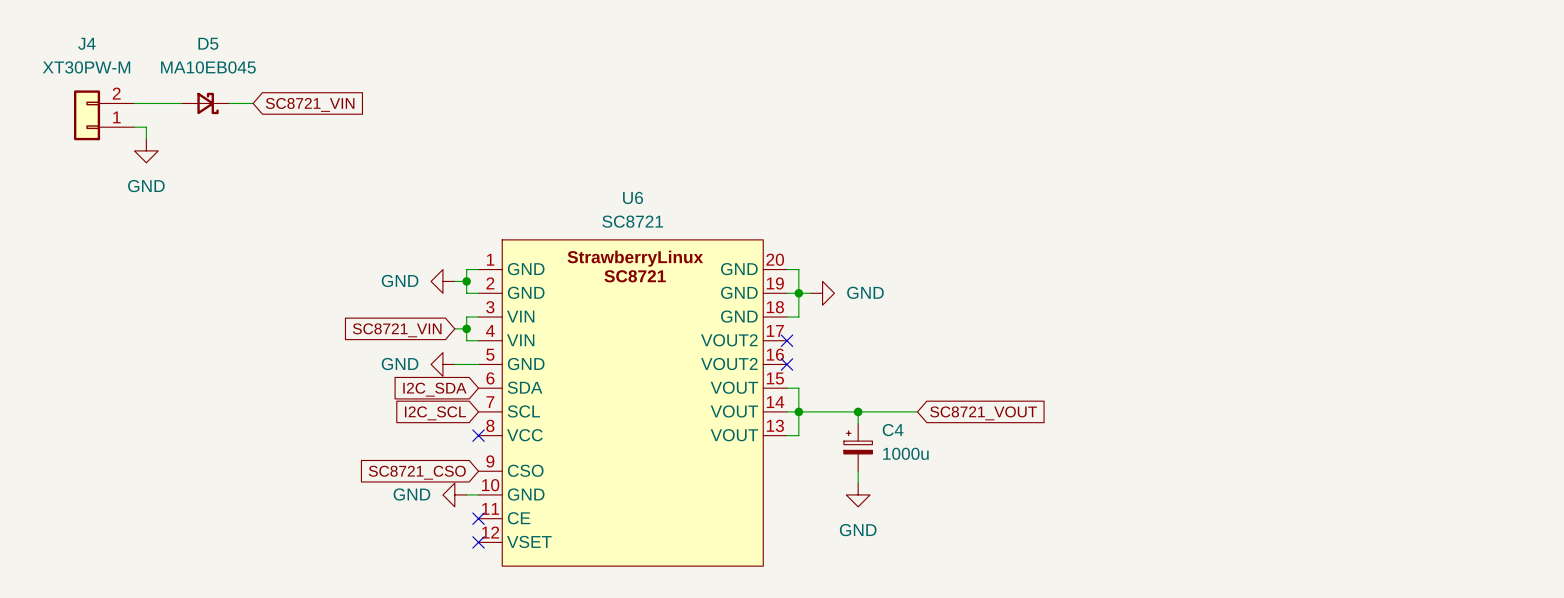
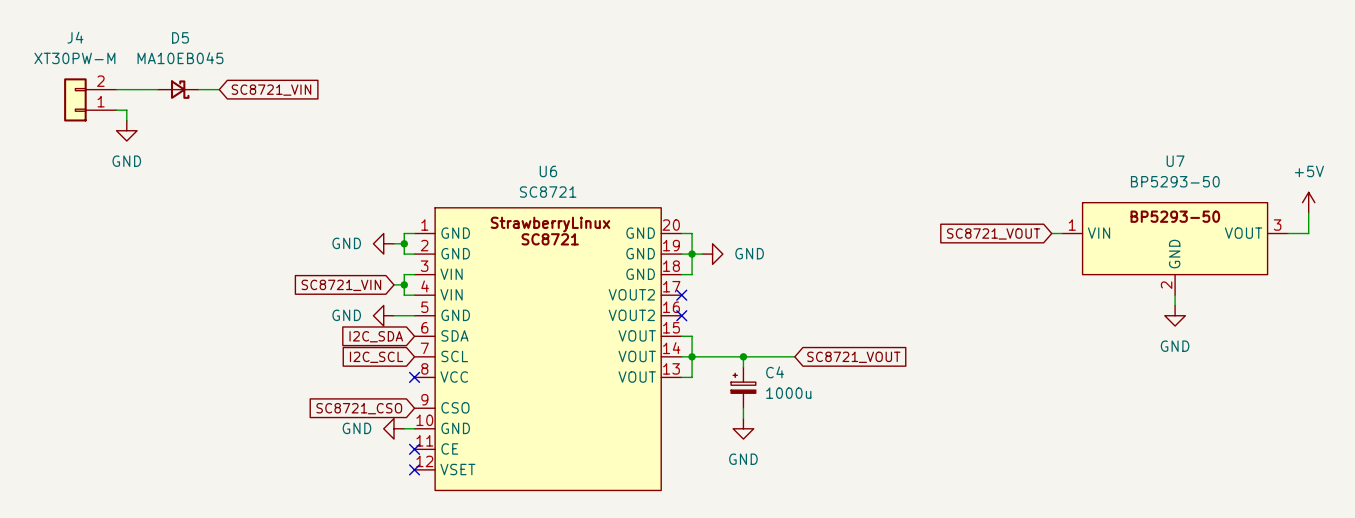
power symbol: none -> +5V (1308, 202)
wire: none -> (1308, 212) (1308, 233) (1288, 233)
wire: none -> (1051, 233) (1062, 233)
global label: none -> SC8721_VOUT (993, 233)
U7: none -> BP5293-50 (1175, 248)
wire: none -> (1175, 295) (1175, 305)
power symbol: none -> GND (1175, 315)

